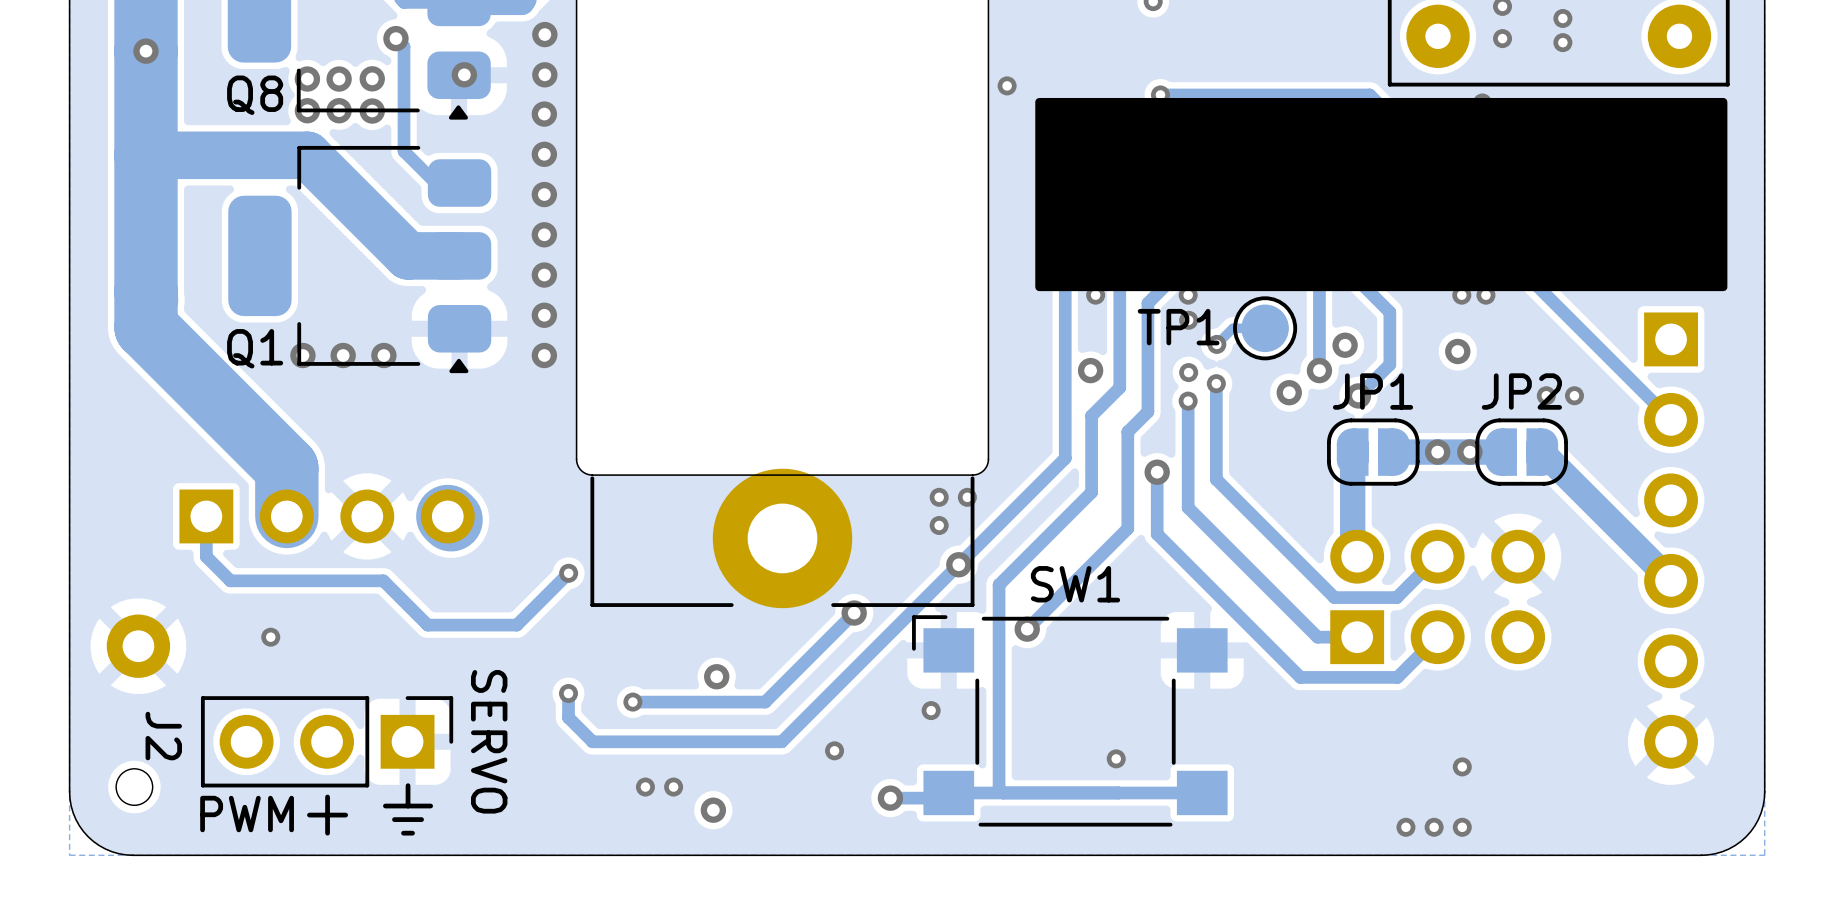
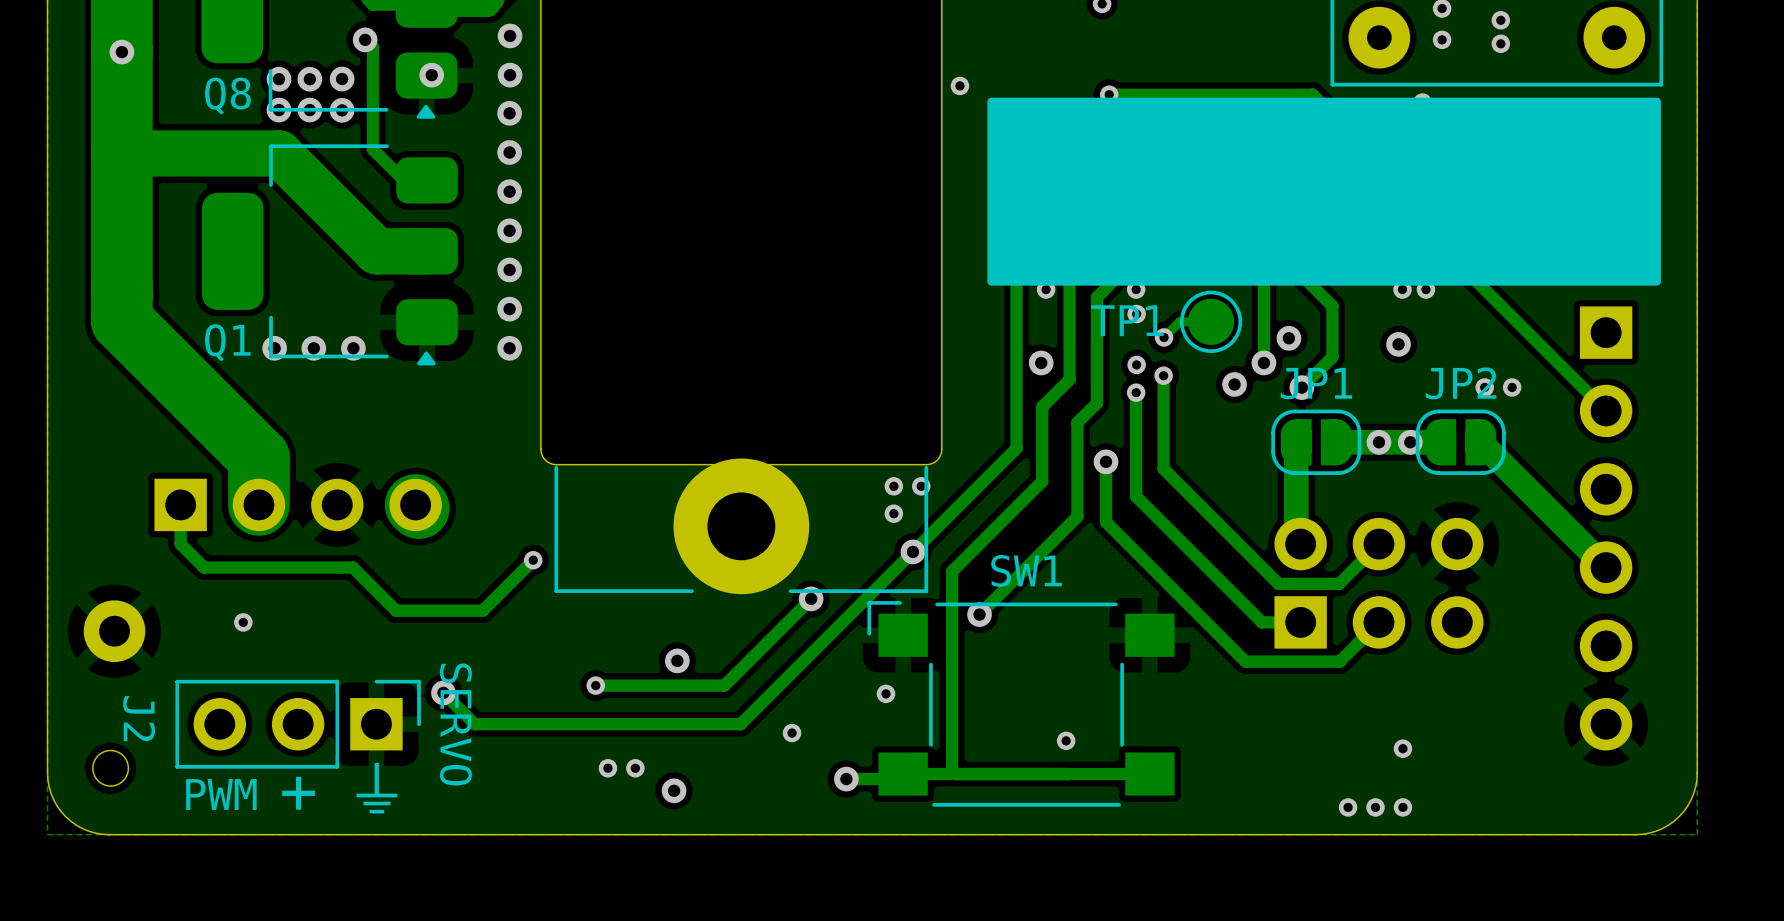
track: (568, 693) (568, 717) (592, 741) -> (443, 692) (474, 724) (556, 724)
via: (568, 693) -> none
via: none -> (443, 692)

